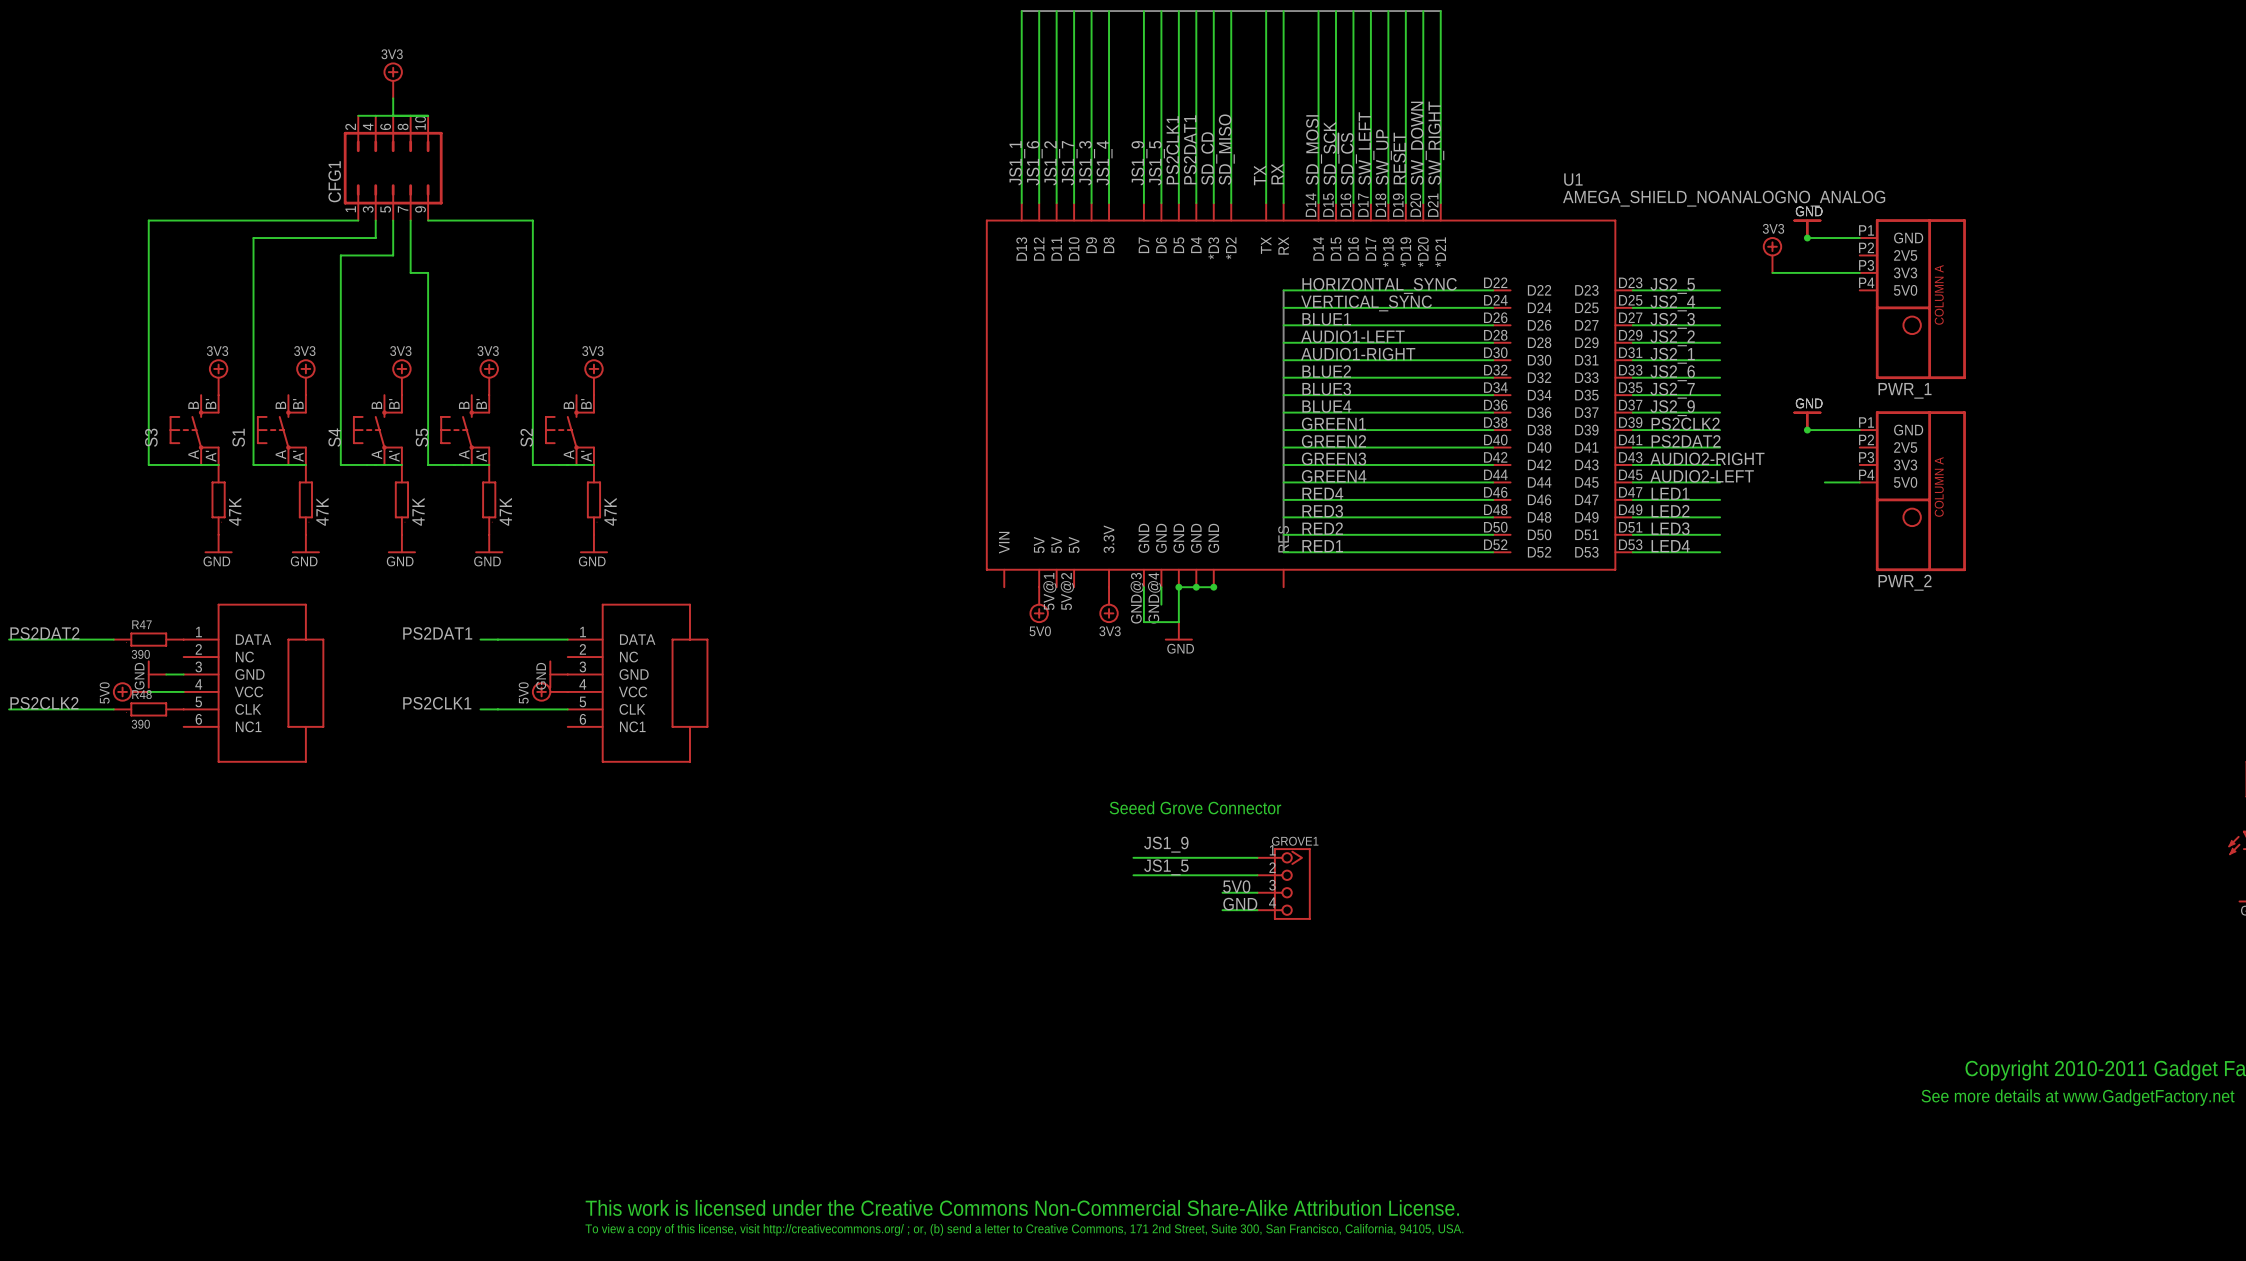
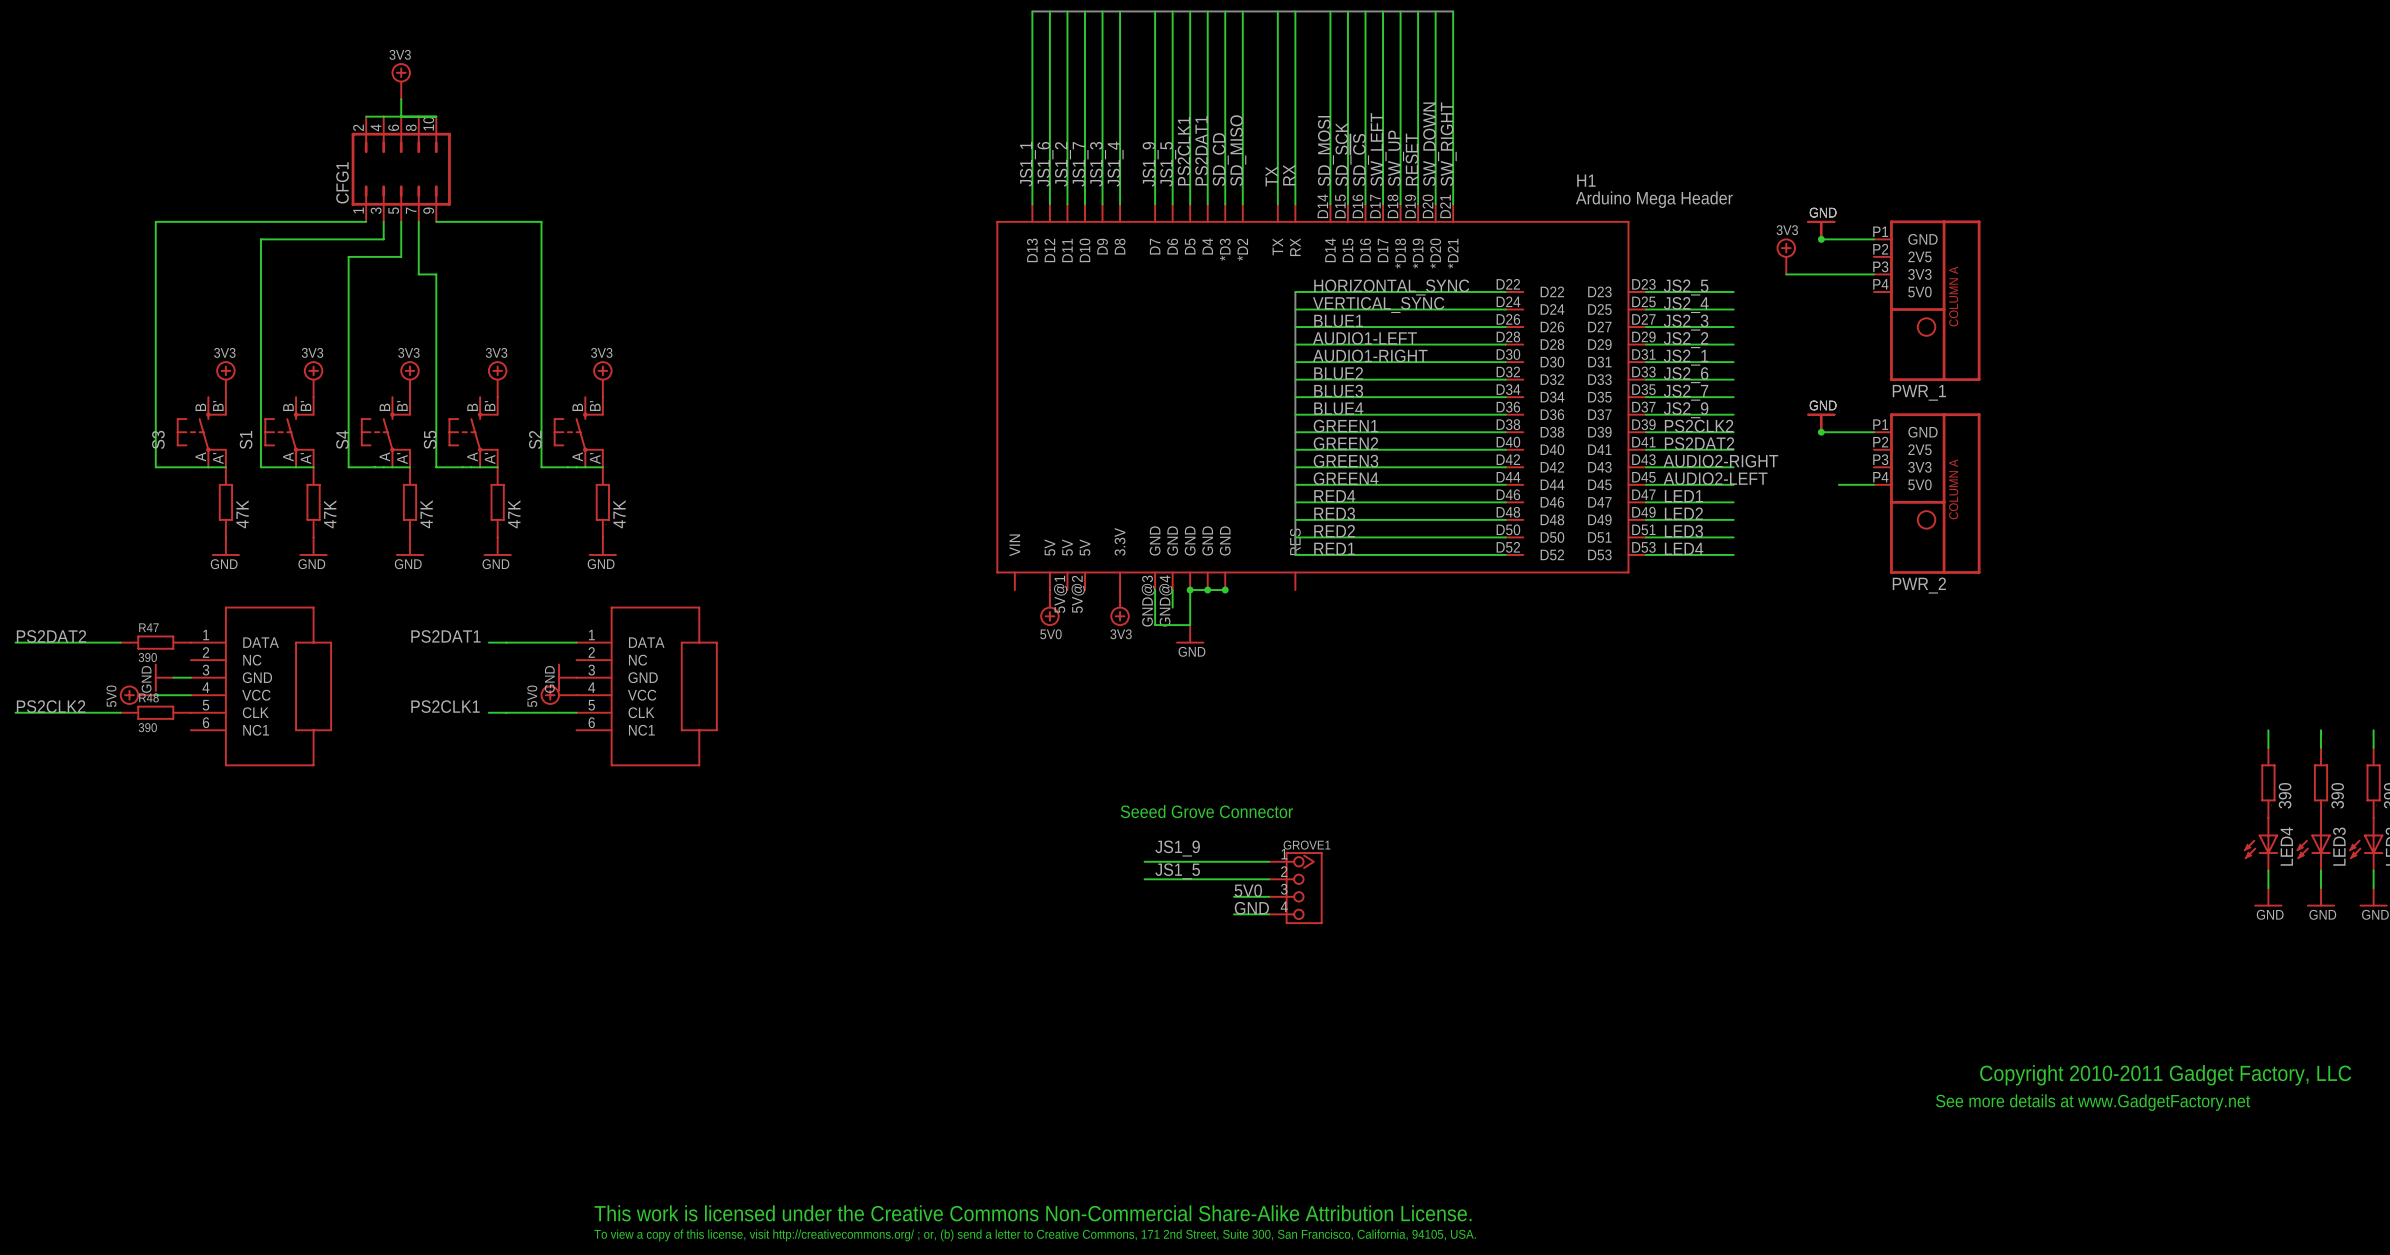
U1 name: U1 (1573, 179) -> H1 (1586, 180)
U1 value: AMEGA_SHIELD_NOANALOGNO_ANALOG (1724, 198) -> Arduino Mega Header (1654, 199)

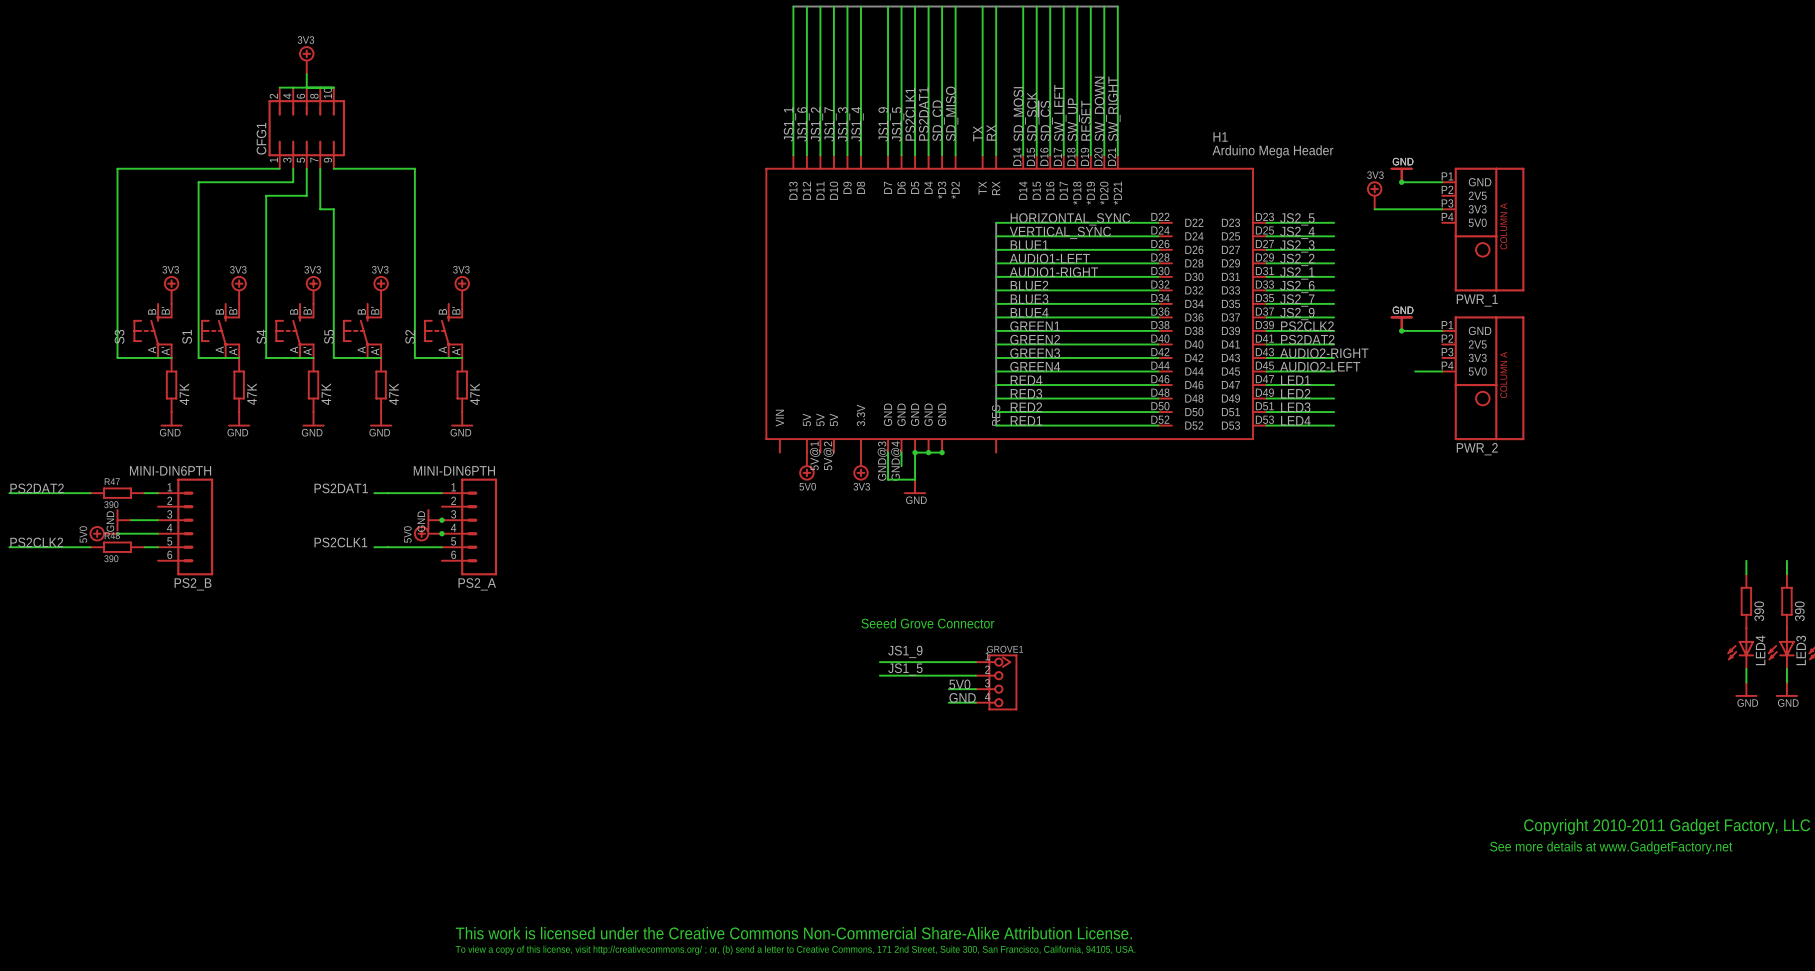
junction: none -> (441, 520)
PS2_B: none -> MINI-DIN6PTH (185, 526)
part: (261, 686) -> none
PS2_A: none -> MINI-DIN6PTH (469, 526)
part: (647, 686) -> none
junction: none -> (441, 533)

